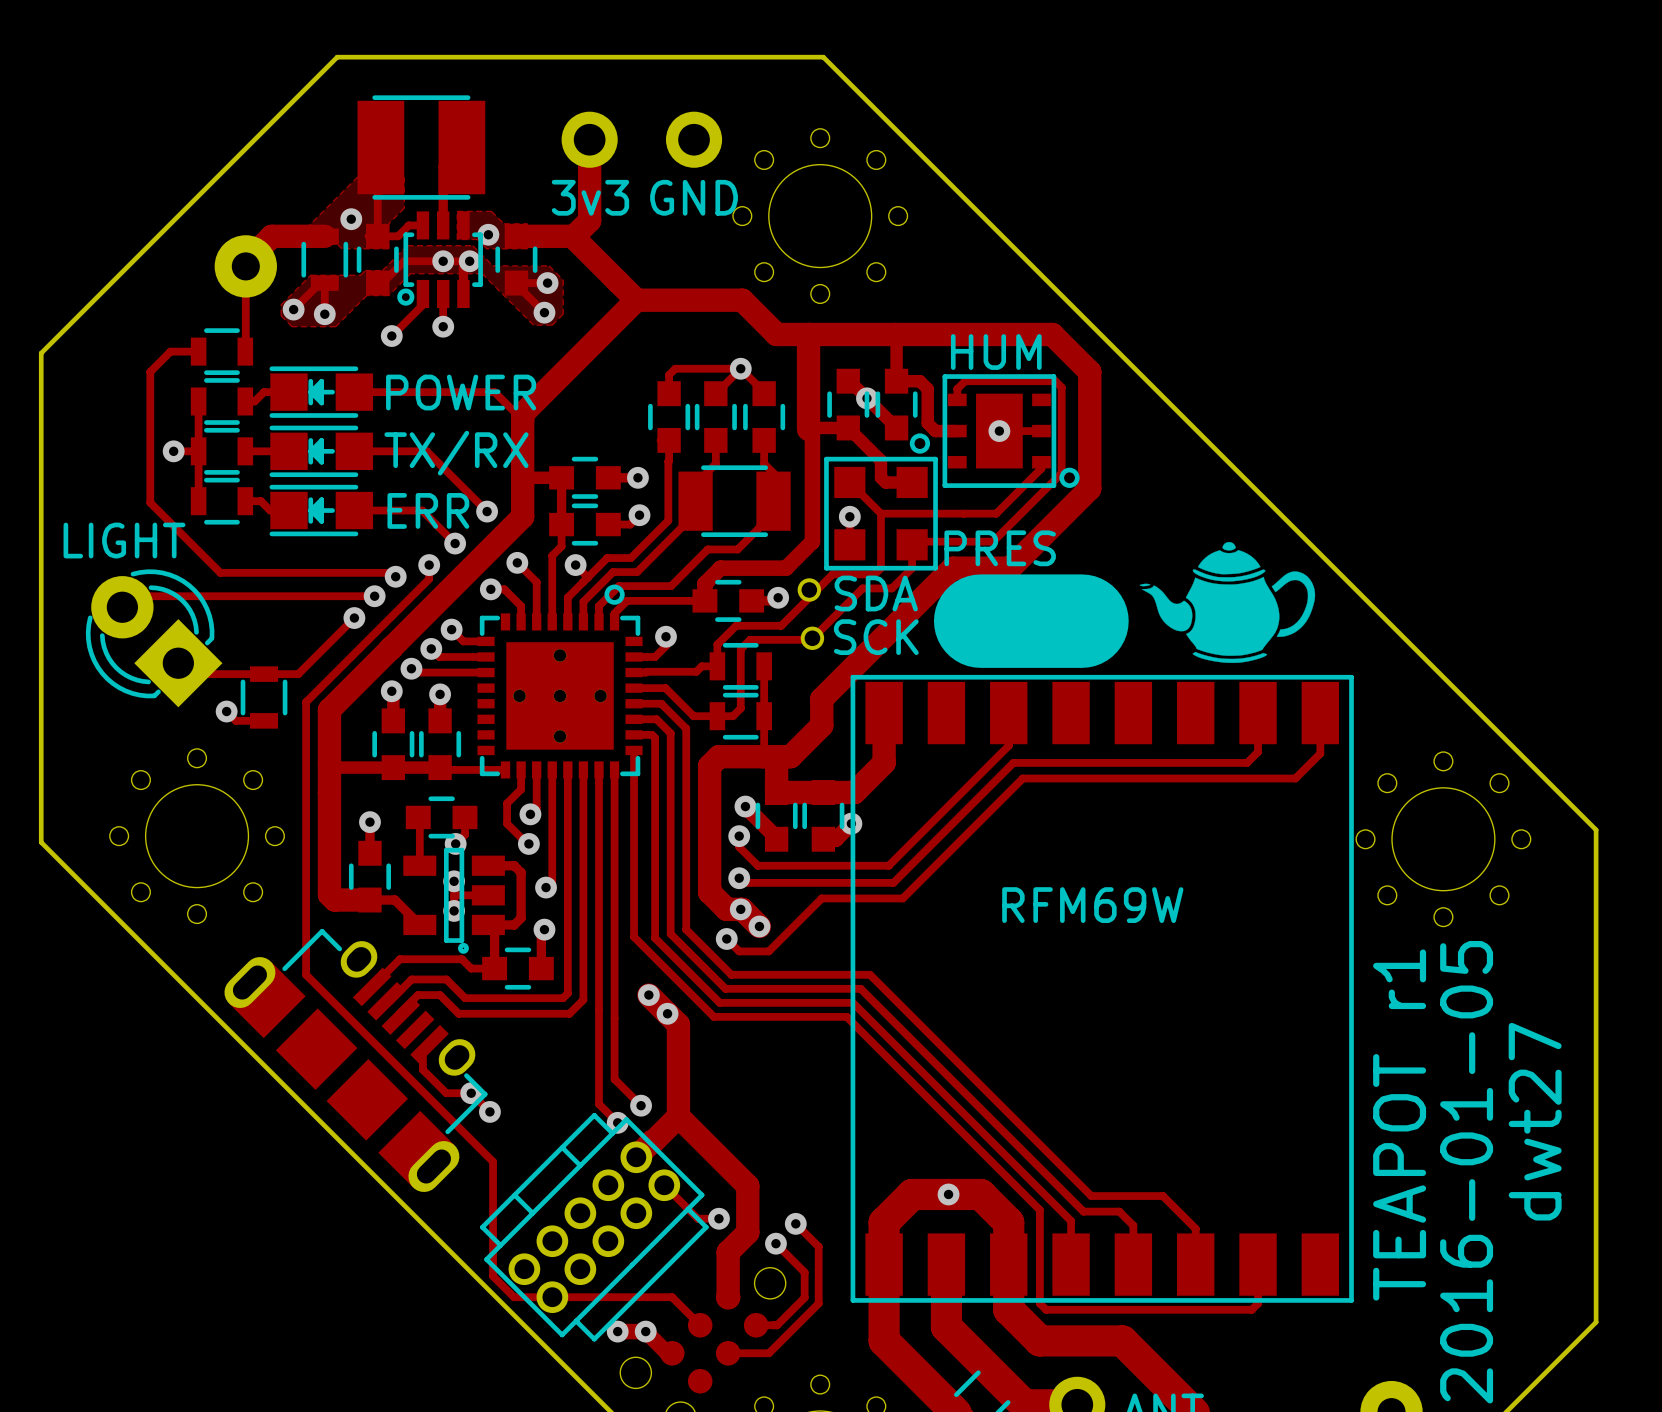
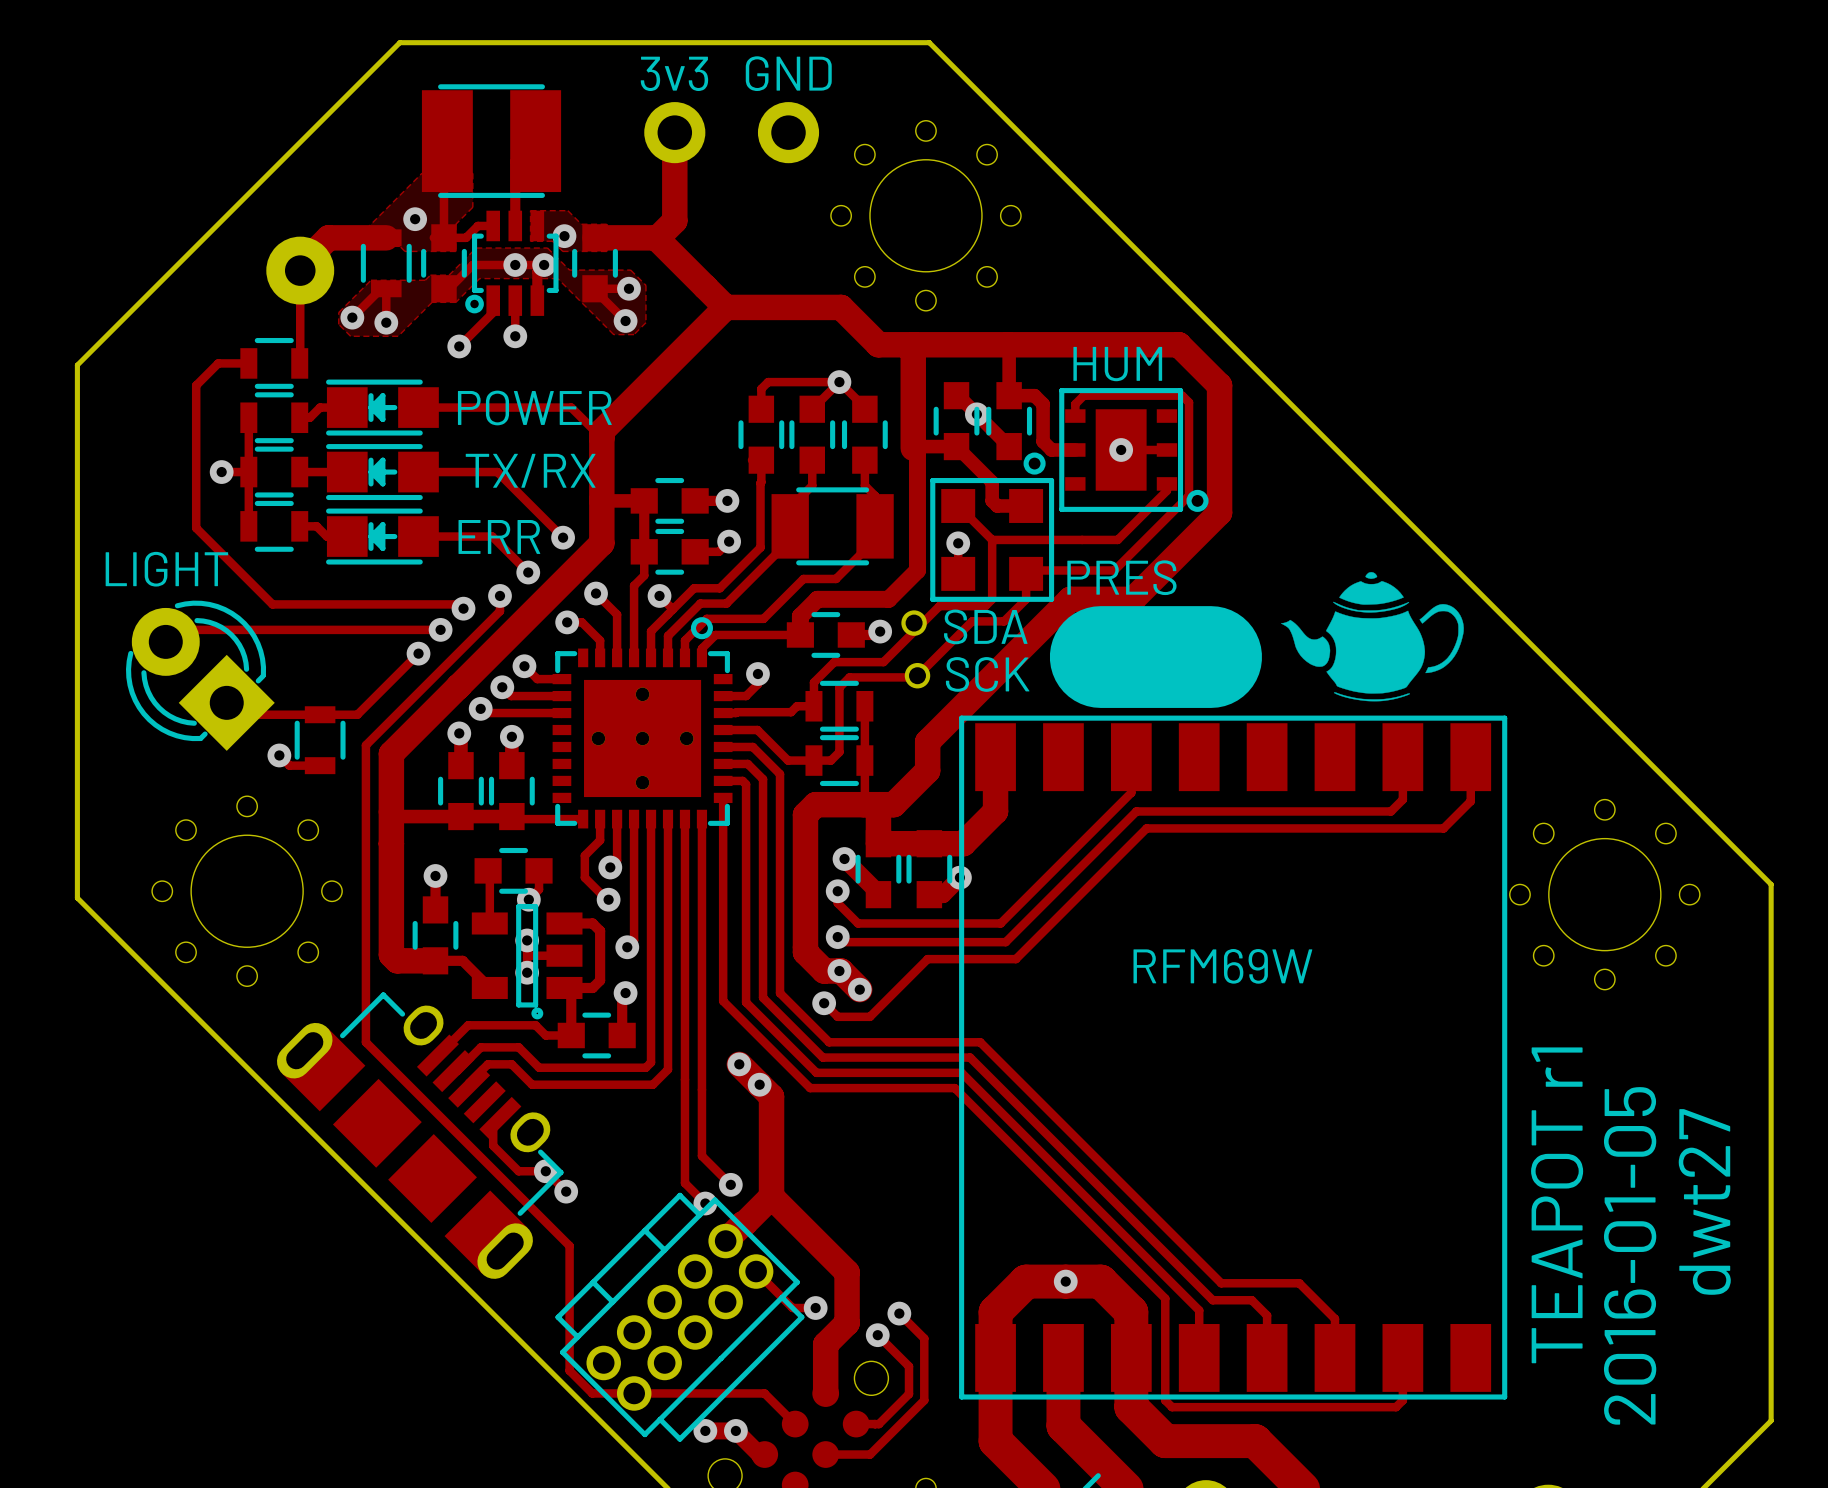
part value position: 3v3 (590, 197) -> 3v3 (674, 73)
part value position: GND (694, 197) -> GND (788, 73)
drawing shape: [1139, 541, 1316, 663] -> [1280, 572, 1464, 702]

